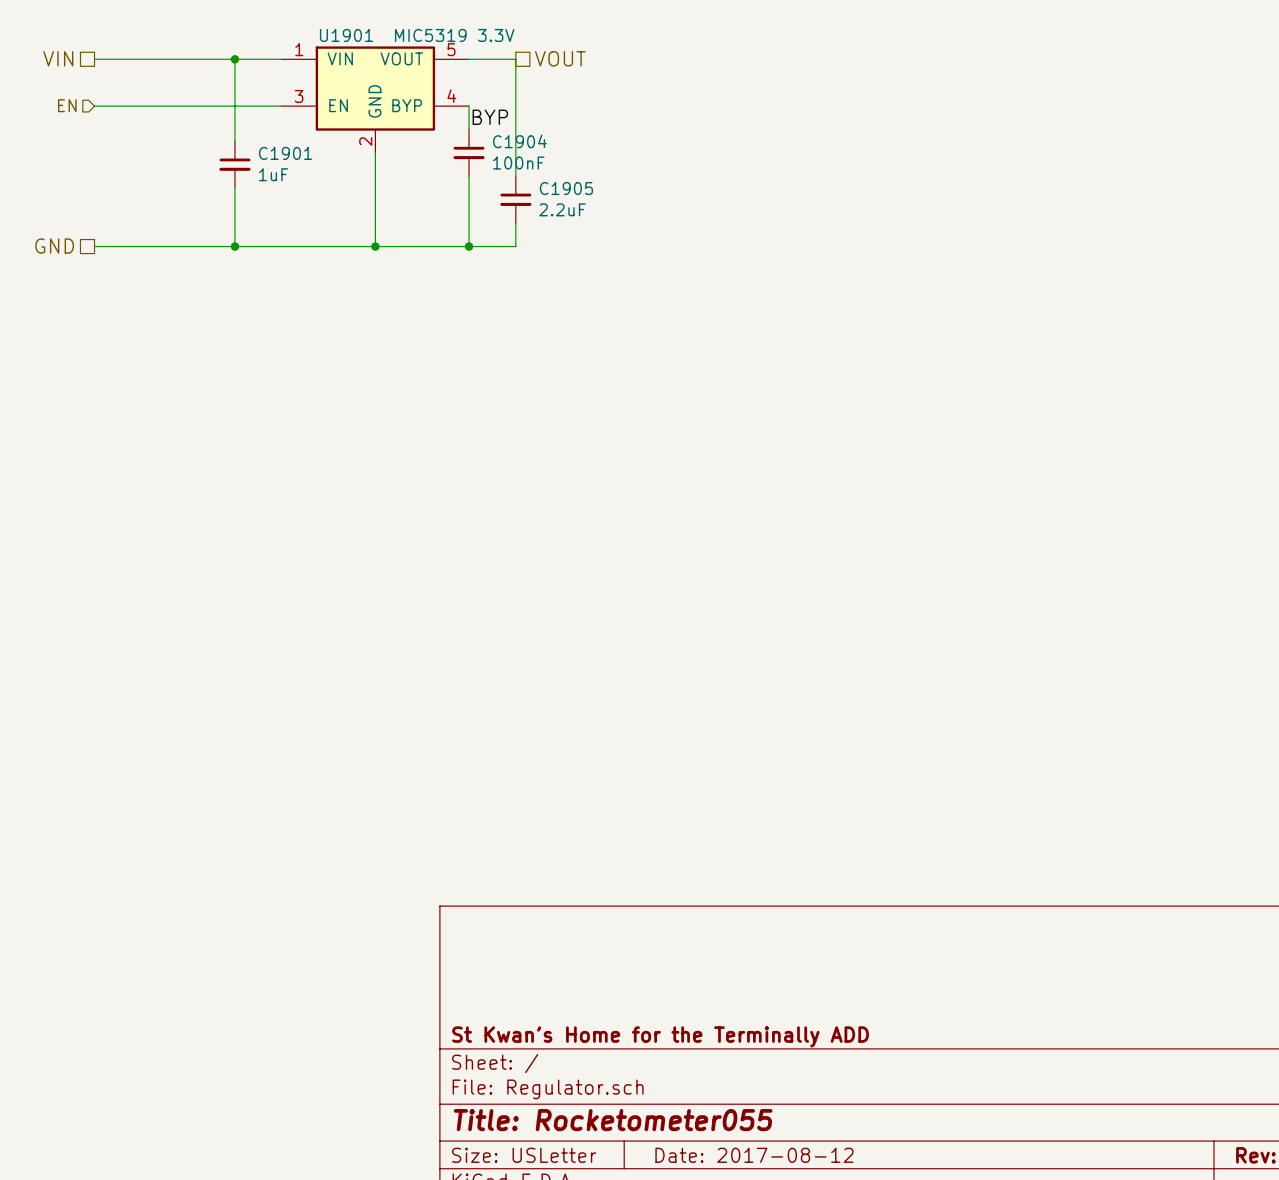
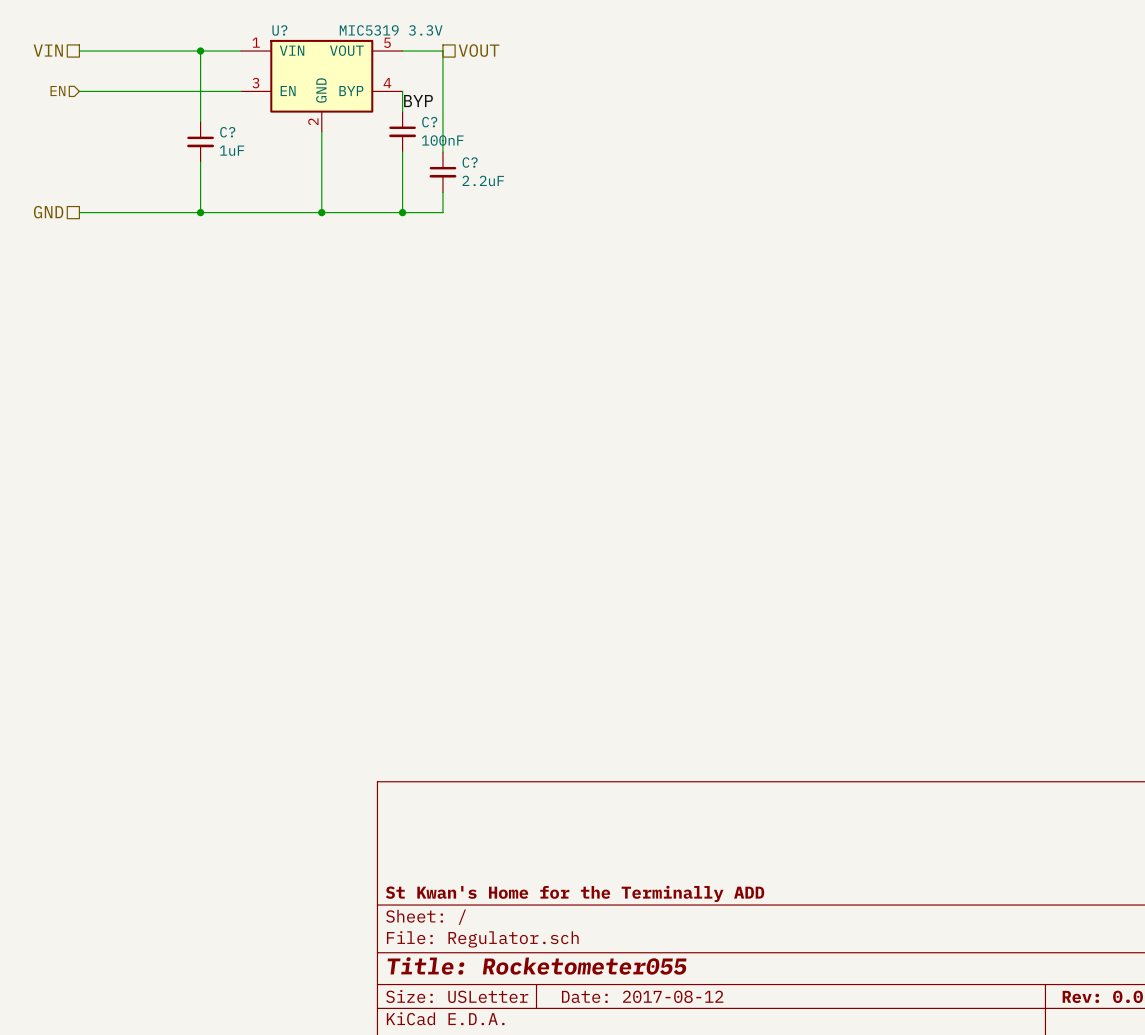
U1901 name: U1901 (346, 35) -> U? (279, 30)
C1904 name: C1904 (519, 141) -> C? (429, 122)
C1901 name: C1901 (285, 153) -> C? (227, 132)
C1905 name: C1905 (566, 188) -> C? (470, 162)

